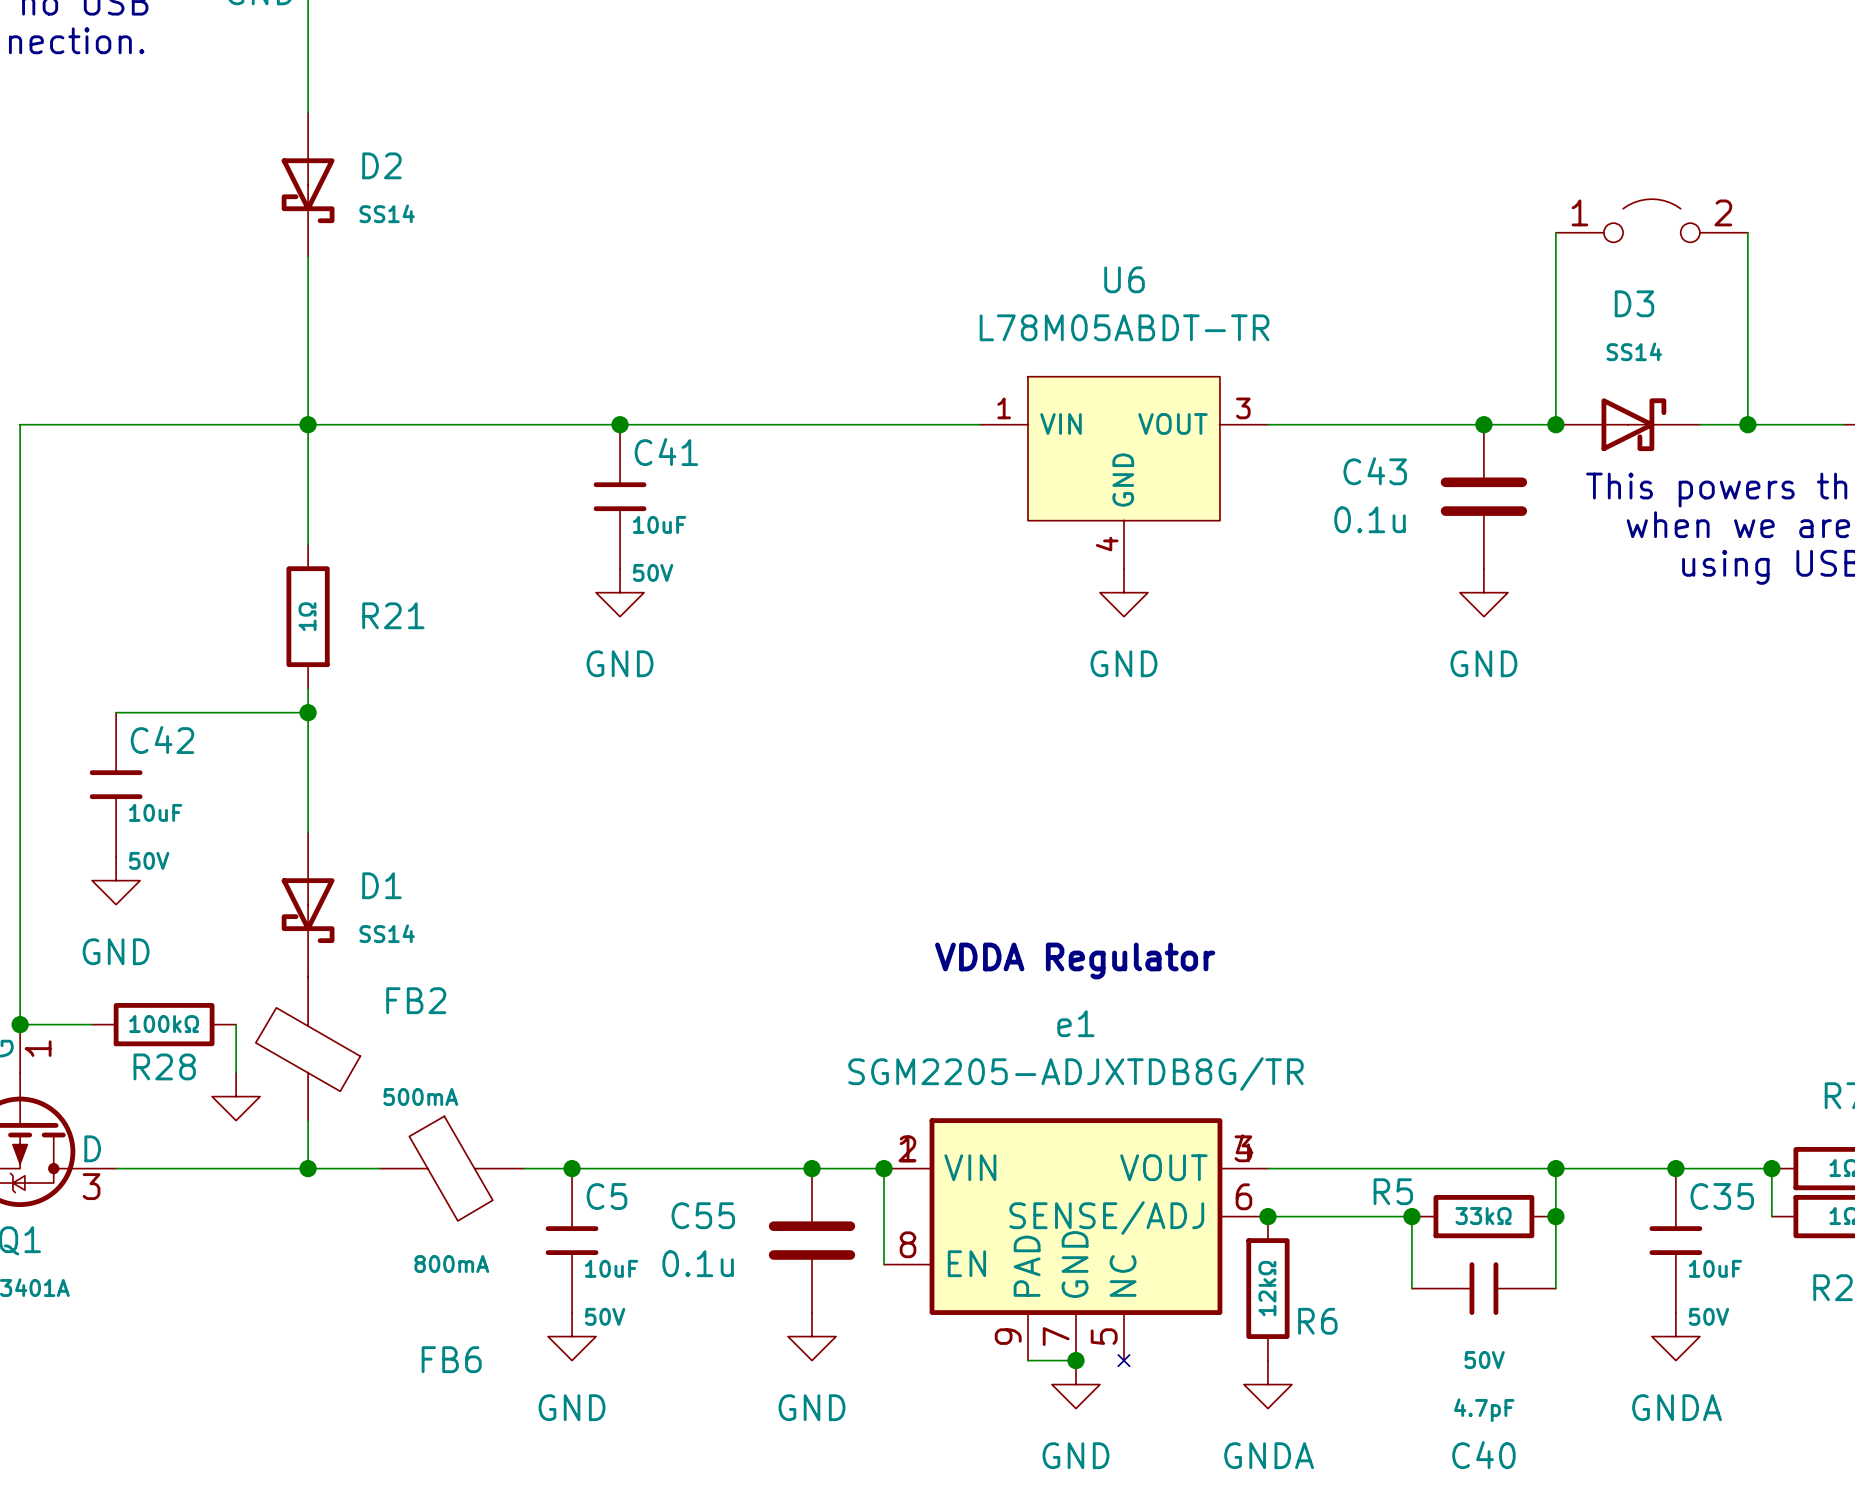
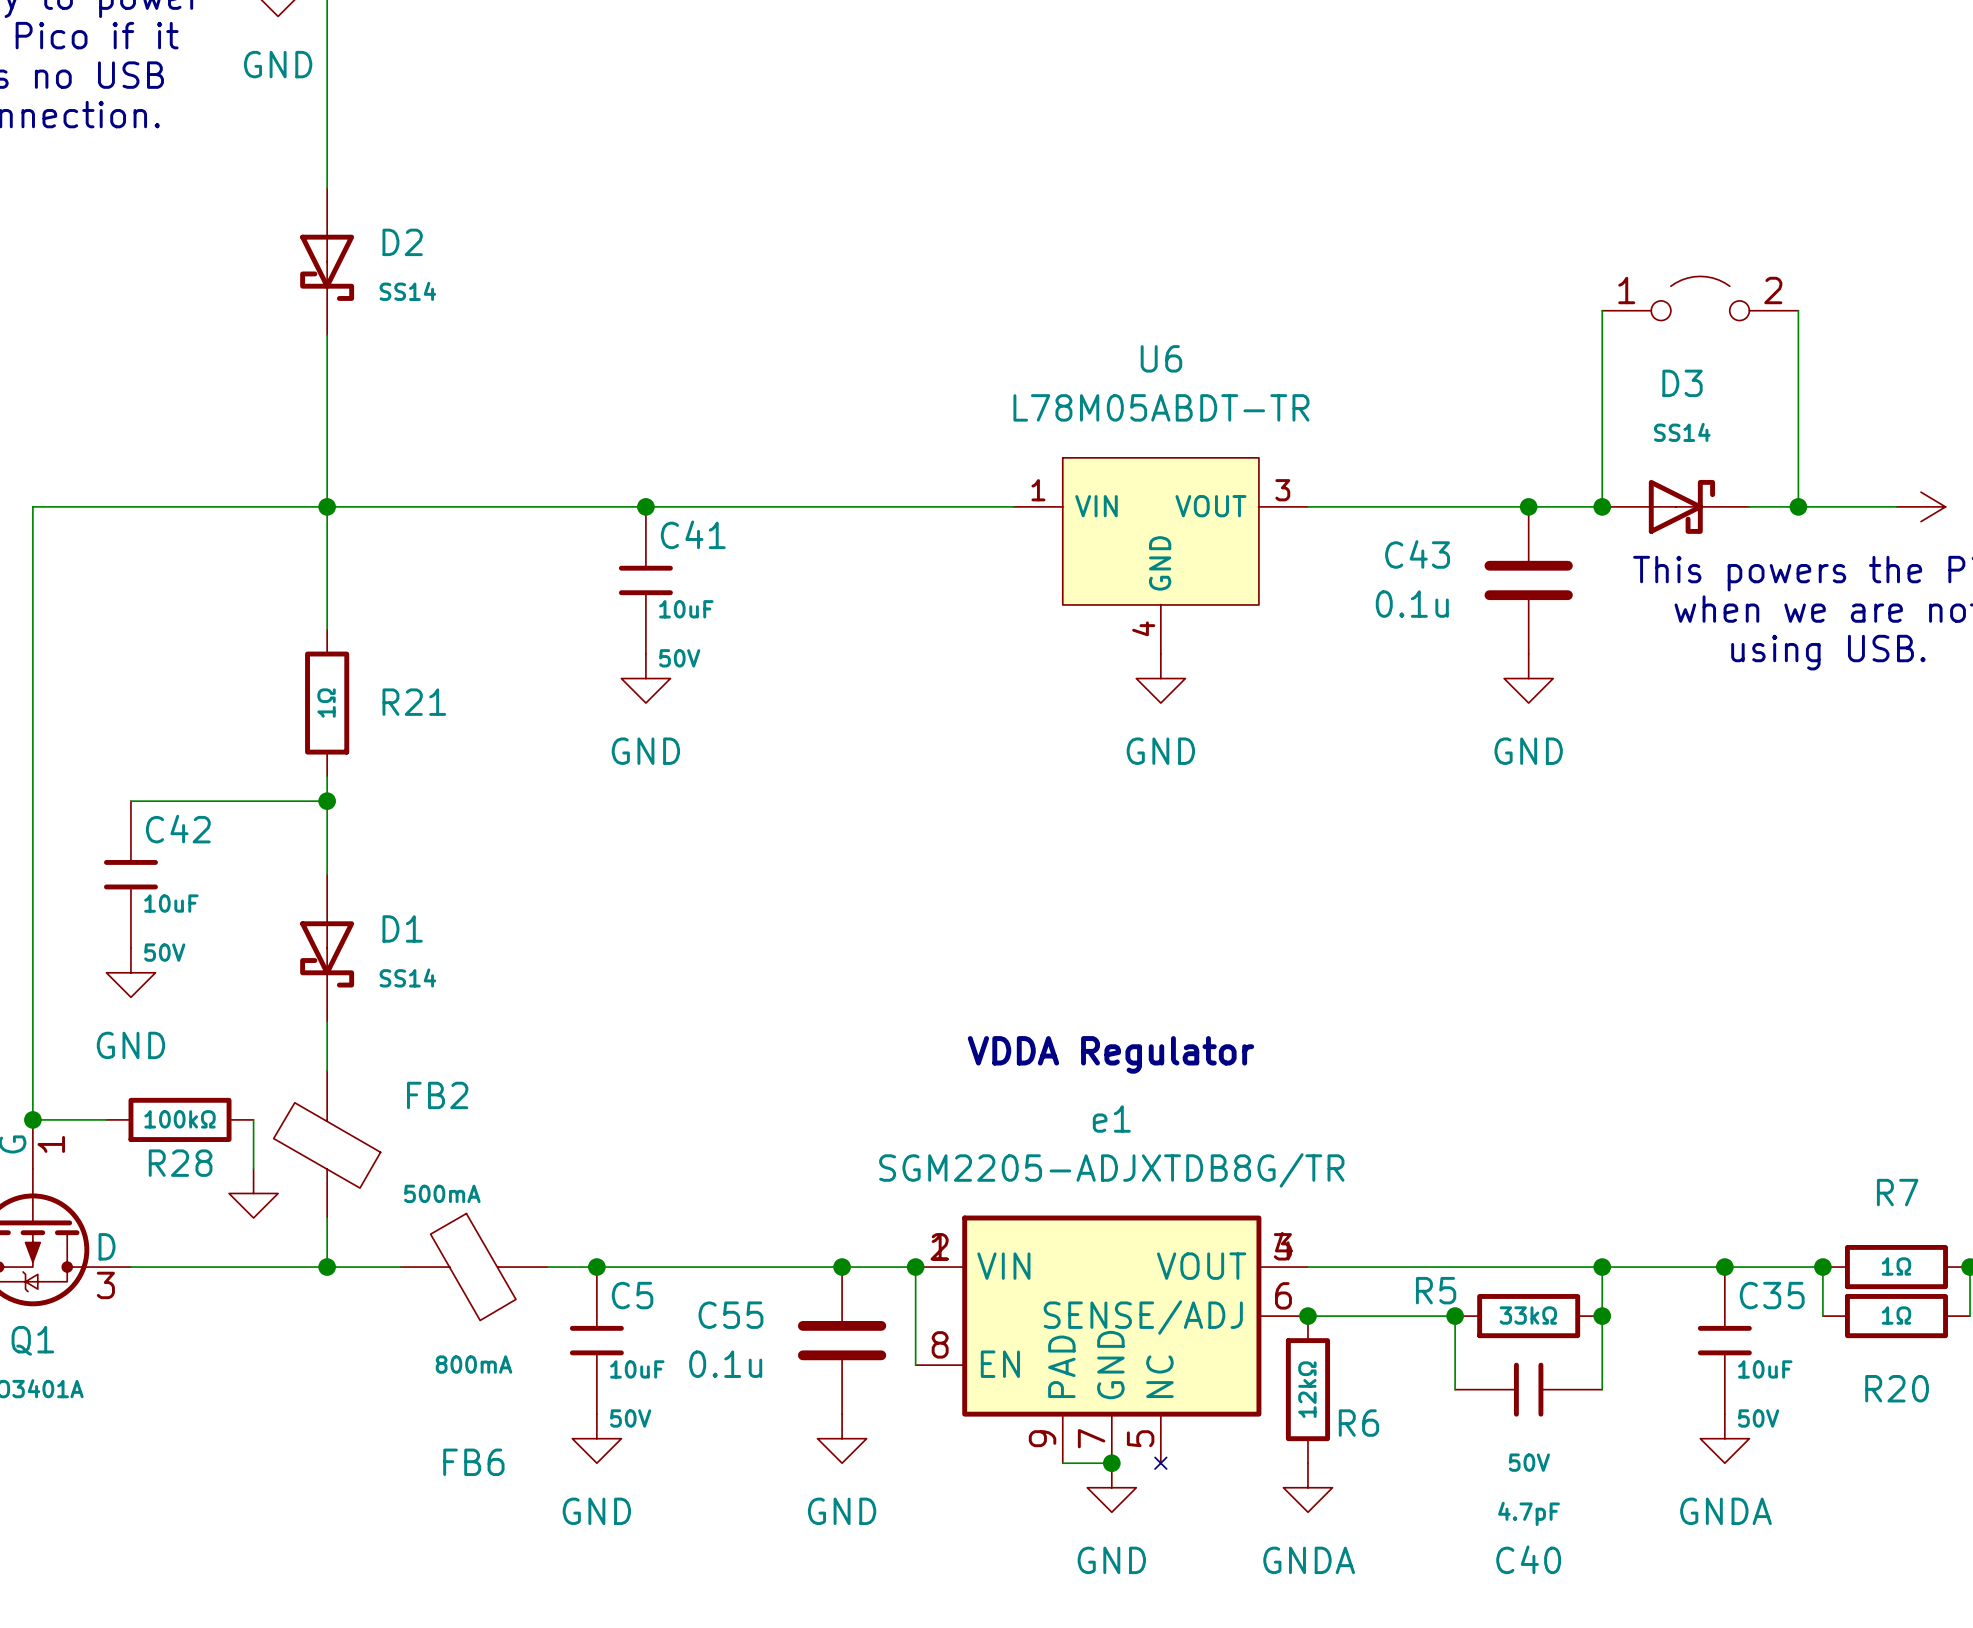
D1 position: (308, 904) -> (327, 948)

